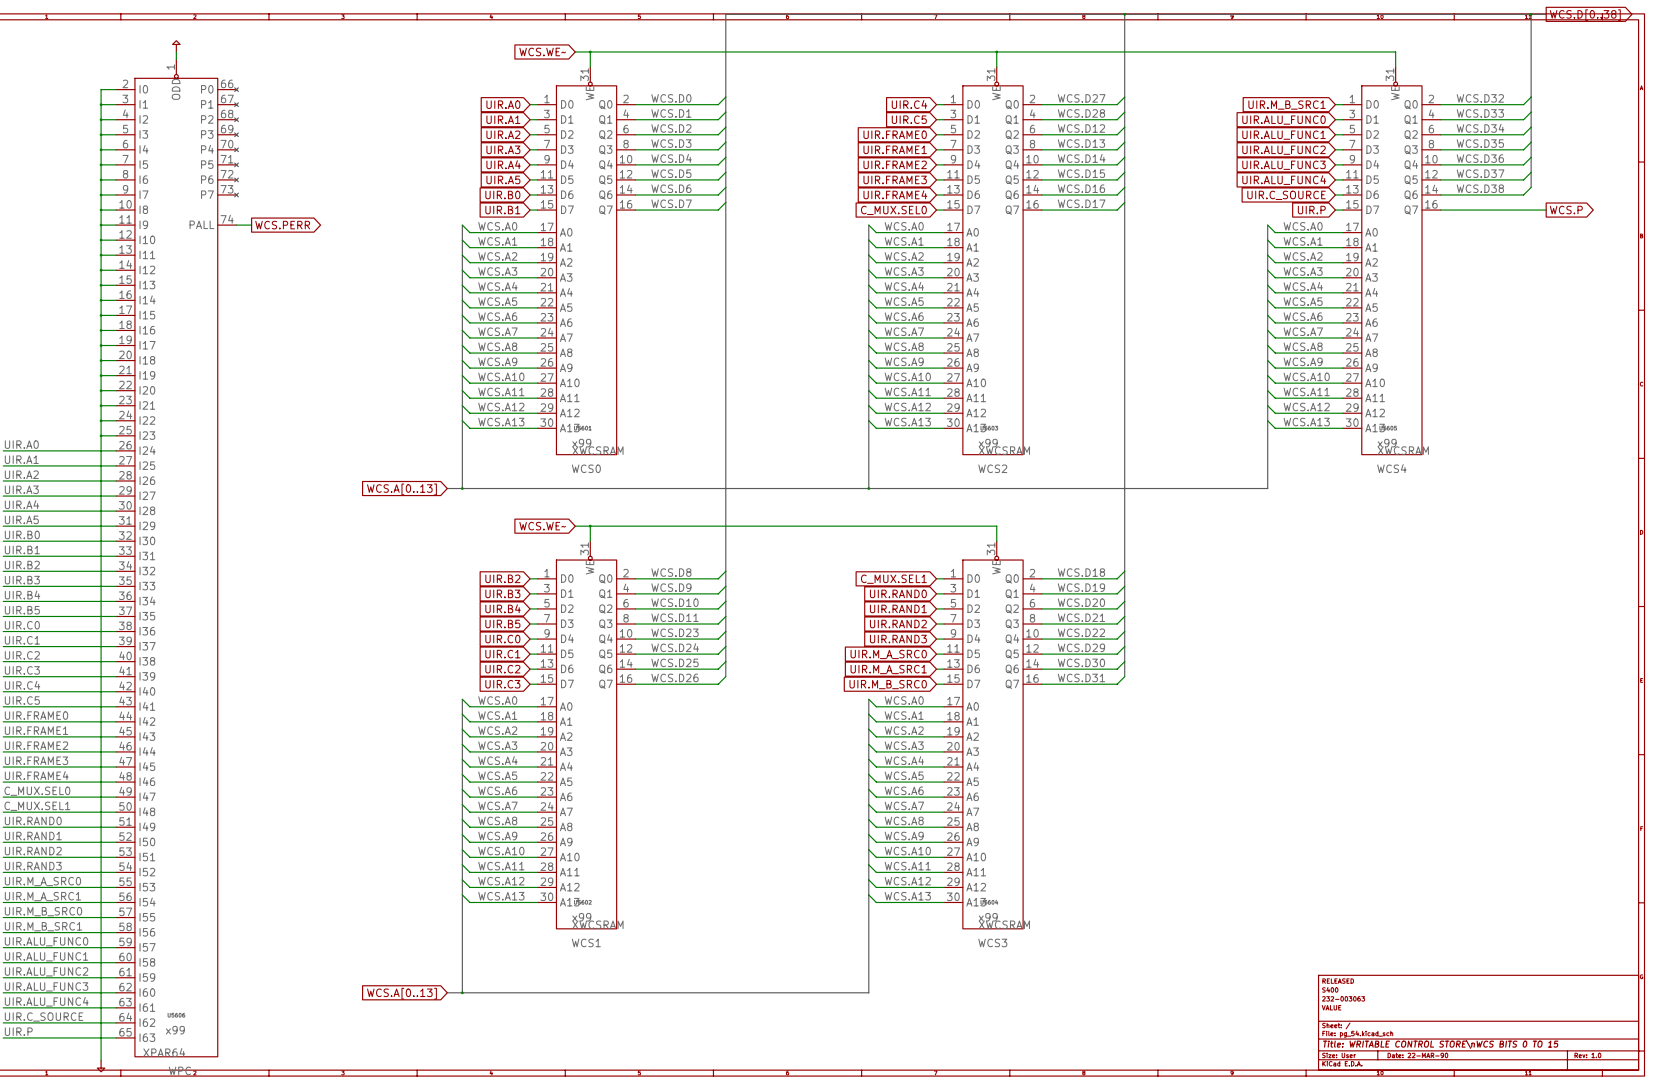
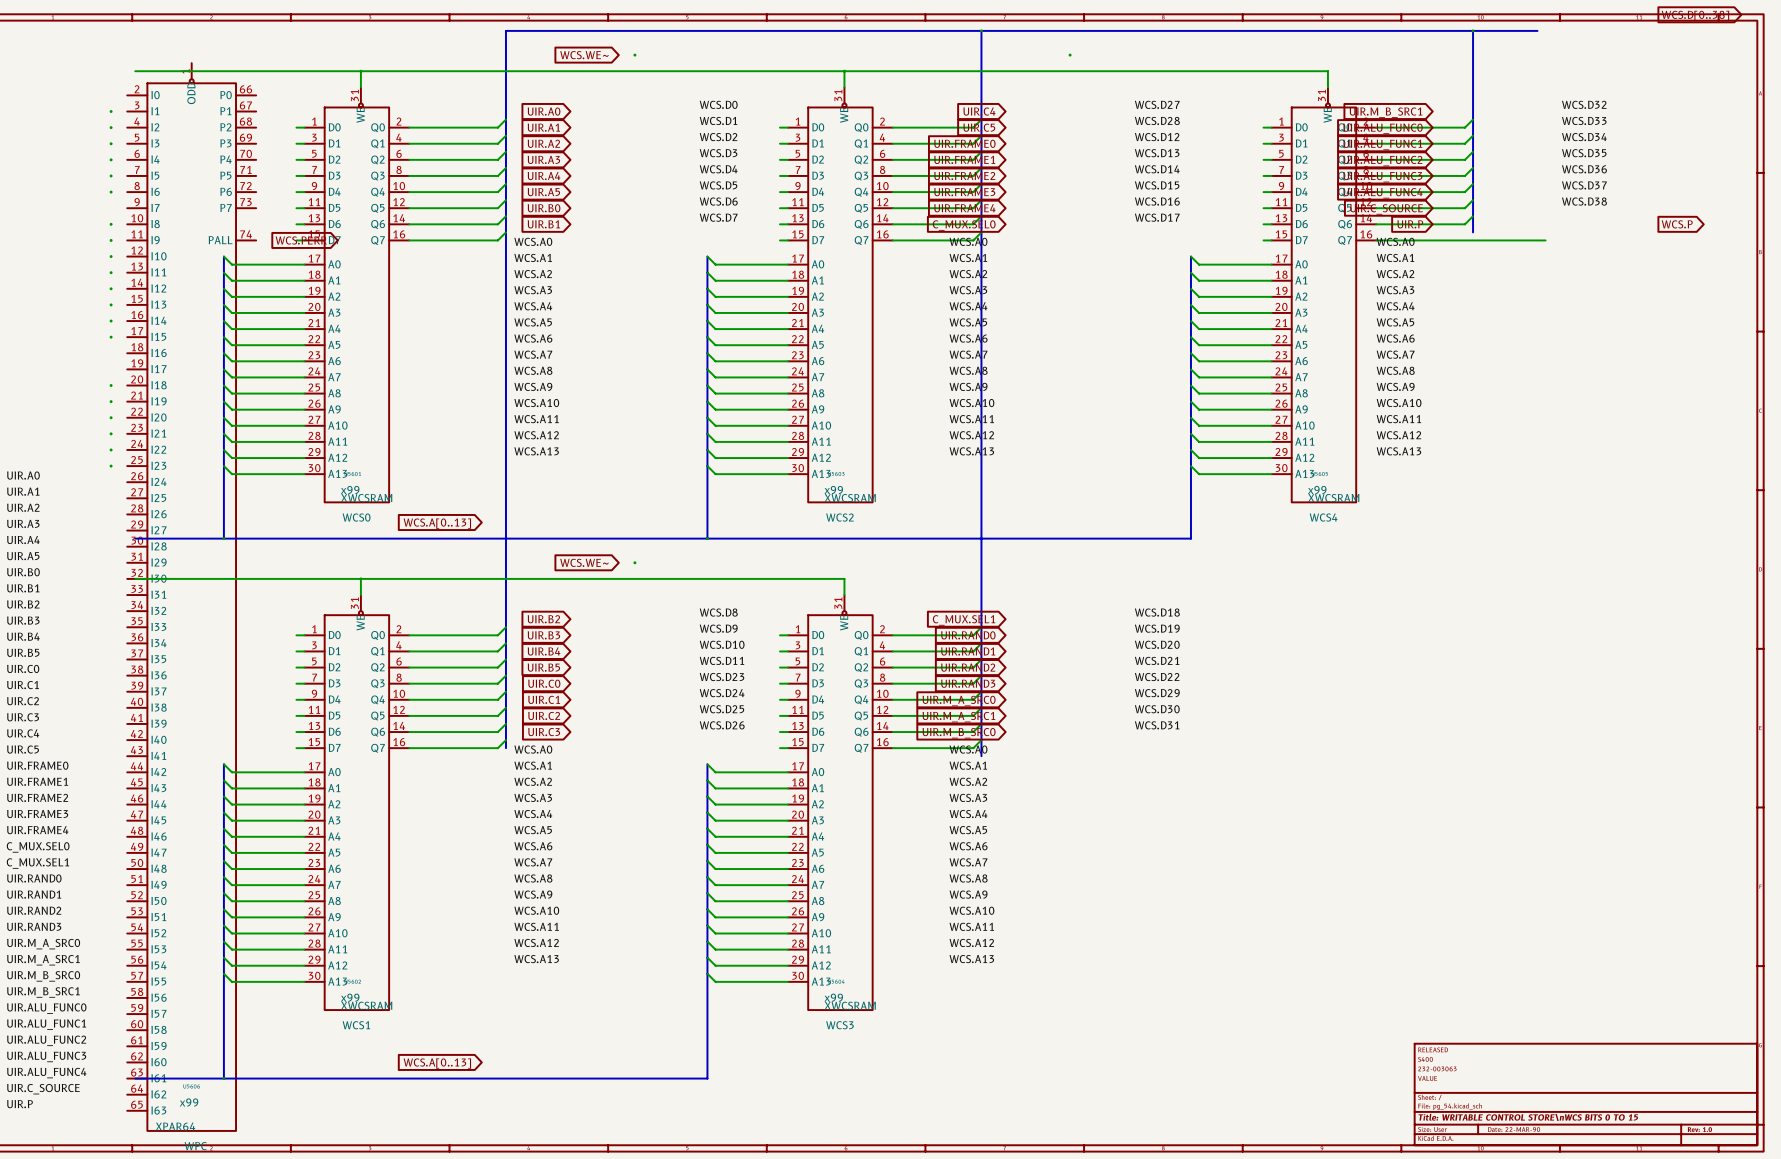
bus: (1124, 14) (1124, 676) -> none
junction: (1124, 14) -> none
bus: (1531, 14) (1531, 187) -> none
junction: (1531, 14) -> none
bus: (1546, 14) (725, 14) (725, 676) -> none
bus: none -> (981, 30) (981, 756)
junction: none -> (981, 30)
bus: none -> (1473, 30) (1473, 232)
junction: none -> (1473, 30)
bus: none -> (1537, 30) (505, 30) (505, 748)
power symbol: (176, 46) -> none
wire: (176, 51) (176, 59) -> none
wire: (575, 51) (1395, 51) (1395, 67) -> none
wire: (590, 51) (590, 67) -> none
wire: (996, 51) (996, 67) -> none
wire: none -> (135, 71) (1327, 71) (1327, 87)
wire: none -> (360, 71) (360, 87)
wire: none -> (844, 71) (844, 87)
wire: (116, 89) (101, 89) (101, 1060) -> none
no-connect mark: (236, 89) -> none
wire: (725, 97) (718, 104) (635, 104) -> none
wire: (1124, 97) (1117, 104) (1041, 104) -> none
wire: (1531, 97) (1523, 104) (1440, 104) -> none
wire: (101, 104) (116, 104) -> none
no-connect mark: (236, 104) -> none
wire: (530, 104) (537, 104) -> none
wire: (936, 104) (944, 104) -> none
wire: (1335, 104) (1342, 104) -> none
wire: none -> (505, 119) (497, 127) (409, 127)
wire: (725, 112) (718, 119) (635, 119) -> none
wire: none -> (981, 119) (973, 127) (892, 127)
wire: (1124, 112) (1117, 119) (1041, 119) -> none
wire: (1531, 112) (1523, 119) (1440, 119) -> none
wire: (101, 119) (116, 119) -> none
no-connect mark: (236, 119) -> none
wire: none -> (296, 127) (304, 127)
wire: (530, 119) (537, 119) -> none
wire: none -> (779, 127) (788, 127)
wire: (936, 119) (944, 119) -> none
wire: none -> (1263, 127) (1271, 127)
wire: none -> (1376, 127) (1432, 127)
wire: none -> (505, 135) (497, 143) (409, 143)
wire: (725, 127) (718, 134) (635, 134) -> none
wire: none -> (981, 135) (973, 143) (892, 143)
wire: (1124, 127) (1117, 134) (1041, 134) -> none
wire: (1531, 127) (1523, 134) (1440, 134) -> none
wire: (101, 134) (116, 134) -> none
no-connect mark: (236, 134) -> none
wire: none -> (296, 143) (304, 143)
wire: (530, 134) (537, 134) -> none
wire: none -> (779, 143) (788, 143)
wire: (936, 134) (944, 134) -> none
wire: none -> (1263, 143) (1271, 143)
wire: none -> (1376, 143) (1432, 143)
wire: none -> (505, 151) (497, 159) (409, 159)
wire: (725, 142) (718, 149) (635, 149) -> none
wire: none -> (981, 151) (973, 159) (892, 159)
wire: (1124, 142) (1117, 149) (1041, 149) -> none
wire: (1531, 142) (1523, 149) (1440, 149) -> none
wire: (101, 149) (116, 149) -> none
no-connect mark: (236, 149) -> none
wire: none -> (296, 159) (304, 159)
wire: (530, 149) (537, 149) -> none
wire: none -> (779, 159) (788, 159)
wire: (936, 149) (944, 149) -> none
wire: none -> (1263, 159) (1271, 159)
wire: none -> (1376, 159) (1432, 159)
wire: none -> (505, 167) (497, 175) (409, 175)
wire: (725, 157) (718, 164) (635, 164) -> none
wire: none -> (981, 167) (973, 175) (892, 175)
wire: (1124, 157) (1117, 164) (1041, 164) -> none
wire: (1531, 157) (1523, 164) (1440, 164) -> none
wire: (101, 164) (116, 164) -> none
no-connect mark: (236, 164) -> none
wire: none -> (296, 175) (304, 175)
wire: (530, 164) (537, 164) -> none
wire: none -> (779, 175) (788, 175)
wire: (936, 164) (944, 164) -> none
wire: none -> (1263, 175) (1271, 175)
wire: none -> (1376, 175) (1432, 175)
wire: none -> (505, 184) (497, 192) (409, 192)
wire: (725, 172) (718, 179) (635, 179) -> none
wire: none -> (981, 184) (973, 192) (892, 192)
wire: (1124, 172) (1117, 179) (1041, 179) -> none
wire: (1531, 172) (1523, 179) (1440, 179) -> none
wire: (101, 179) (116, 179) -> none
no-connect mark: (236, 179) -> none
wire: none -> (296, 192) (304, 192)
wire: (530, 179) (537, 179) -> none
wire: none -> (779, 192) (788, 192)
wire: (936, 179) (944, 179) -> none
wire: none -> (1263, 192) (1271, 192)
wire: none -> (1376, 192) (1432, 192)
wire: none -> (505, 200) (497, 208) (409, 208)
wire: (725, 187) (718, 194) (635, 194) -> none
wire: none -> (981, 200) (973, 208) (892, 208)
wire: (1124, 187) (1117, 194) (1041, 194) -> none
wire: (1531, 187) (1523, 194) (1440, 194) -> none
wire: (101, 194) (116, 194) -> none
no-connect mark: (236, 194) -> none
wire: none -> (296, 208) (304, 208)
wire: (530, 194) (537, 194) -> none
wire: none -> (779, 208) (788, 208)
wire: (936, 194) (944, 194) -> none
wire: none -> (1263, 208) (1271, 208)
wire: none -> (1376, 208) (1432, 208)
wire: none -> (505, 216) (497, 224) (409, 224)
wire: (725, 202) (718, 210) (635, 210) -> none
wire: none -> (981, 216) (973, 224) (892, 224)
wire: (1124, 202) (1117, 210) (1041, 210) -> none
wire: (101, 210) (116, 210) -> none
wire: none -> (296, 224) (304, 224)
wire: (530, 210) (537, 210) -> none
wire: none -> (779, 224) (788, 224)
wire: (936, 210) (944, 210) -> none
wire: none -> (1263, 224) (1271, 224)
wire: none -> (1376, 224) (1432, 224)
wire: (1440, 210) (1546, 210) -> none
wire: none -> (505, 232) (497, 240) (409, 240)
wire: none -> (981, 232) (973, 240) (892, 240)
wire: (101, 225) (116, 225) -> none
wire: (236, 225) (251, 225) -> none
wire: none -> (296, 240) (304, 240)
bus: (462, 225) (462, 488) -> none
wire: (462, 225) (469, 232) (537, 232) -> none
wire: none -> (779, 240) (788, 240)
bus: (868, 225) (868, 488) -> none
wire: (868, 225) (876, 232) (944, 232) -> none
wire: none -> (1263, 240) (1271, 240)
bus: (1267, 225) (1267, 488) (447, 488) -> none
wire: (1267, 225) (1275, 232) (1342, 232) -> none
wire: none -> (1376, 240) (1545, 240)
wire: (101, 240) (116, 240) -> none
bus: none -> (223, 256) (223, 538)
wire: none -> (223, 256) (231, 264) (304, 264)
wire: (462, 240) (469, 247) (537, 247) -> none
bus: none -> (707, 256) (707, 538)
wire: none -> (707, 256) (715, 264) (788, 264)
wire: (868, 240) (876, 247) (944, 247) -> none
bus: none -> (1190, 256) (1190, 538) (135, 538)
wire: none -> (1190, 256) (1199, 264) (1271, 264)
wire: (1267, 240) (1275, 247) (1342, 247) -> none
wire: (101, 255) (116, 255) -> none
wire: none -> (223, 272) (231, 280) (304, 280)
wire: (462, 255) (469, 262) (537, 262) -> none
wire: none -> (707, 272) (715, 280) (788, 280)
wire: (868, 255) (876, 262) (944, 262) -> none
wire: none -> (1190, 272) (1199, 280) (1271, 280)
wire: (1267, 255) (1275, 262) (1342, 262) -> none
part position: (586, 260) -> (356, 294)
part position: (992, 260) -> (840, 294)
part position: (1391, 260) -> (1323, 294)
wire: (101, 270) (116, 270) -> none
wire: none -> (223, 288) (231, 296) (304, 296)
wire: (462, 270) (469, 277) (537, 277) -> none
wire: none -> (707, 288) (715, 296) (788, 296)
wire: (868, 270) (876, 277) (944, 277) -> none
wire: none -> (1190, 288) (1199, 296) (1271, 296)
wire: (1267, 270) (1275, 277) (1342, 277) -> none
wire: (101, 285) (116, 285) -> none
wire: none -> (223, 304) (231, 312) (304, 312)
wire: (462, 285) (469, 292) (537, 292) -> none
wire: none -> (707, 304) (715, 312) (788, 312)
wire: (868, 285) (876, 292) (944, 292) -> none
wire: none -> (1190, 304) (1199, 312) (1271, 312)
wire: (1267, 285) (1275, 292) (1342, 292) -> none
wire: (101, 300) (116, 300) -> none
wire: none -> (223, 321) (231, 329) (304, 329)
wire: (462, 300) (469, 307) (537, 307) -> none
wire: none -> (707, 321) (715, 329) (788, 329)
wire: (868, 300) (876, 307) (944, 307) -> none
wire: none -> (1190, 321) (1199, 329) (1271, 329)
wire: (1267, 300) (1275, 307) (1342, 307) -> none
wire: (101, 315) (116, 315) -> none
wire: none -> (223, 337) (231, 345) (304, 345)
wire: (462, 315) (469, 322) (537, 322) -> none
wire: none -> (707, 337) (715, 345) (788, 345)
wire: (868, 315) (876, 322) (944, 322) -> none
wire: none -> (1190, 337) (1199, 345) (1271, 345)
wire: (1267, 315) (1275, 322) (1342, 322) -> none
wire: (101, 330) (116, 330) -> none
junction: (101, 330) -> none
wire: none -> (223, 353) (231, 361) (304, 361)
wire: (462, 330) (469, 337) (537, 337) -> none
wire: none -> (707, 353) (715, 361) (788, 361)
wire: (868, 330) (876, 337) (944, 337) -> none
wire: none -> (1190, 353) (1199, 361) (1271, 361)
wire: (1267, 330) (1275, 337) (1342, 337) -> none
wire: (101, 345) (116, 345) -> none
junction: (101, 345) -> none
wire: none -> (223, 369) (231, 377) (304, 377)
wire: (462, 345) (469, 353) (537, 353) -> none
wire: none -> (707, 369) (715, 377) (788, 377)
wire: (868, 345) (876, 353) (944, 353) -> none
wire: none -> (1190, 369) (1199, 377) (1271, 377)
wire: (1267, 345) (1275, 353) (1342, 353) -> none
wire: (101, 360) (116, 360) -> none
wire: none -> (223, 385) (231, 393) (304, 393)
wire: (462, 360) (469, 368) (537, 368) -> none
wire: none -> (707, 385) (715, 393) (788, 393)
wire: (868, 360) (876, 368) (944, 368) -> none
wire: none -> (1190, 385) (1199, 393) (1271, 393)
wire: (1267, 360) (1275, 368) (1342, 368) -> none
wire: (101, 375) (116, 375) -> none
wire: none -> (223, 401) (231, 409) (304, 409)
wire: (462, 375) (469, 383) (537, 383) -> none
wire: none -> (707, 401) (715, 409) (788, 409)
wire: (868, 375) (876, 383) (944, 383) -> none
wire: none -> (1190, 401) (1199, 409) (1271, 409)
wire: (1267, 375) (1275, 383) (1342, 383) -> none
wire: (101, 390) (116, 390) -> none
wire: none -> (223, 417) (231, 425) (304, 425)
wire: (462, 390) (469, 398) (537, 398) -> none
wire: none -> (707, 417) (715, 425) (788, 425)
wire: (868, 390) (876, 398) (944, 398) -> none
wire: none -> (1190, 417) (1199, 425) (1271, 425)
wire: (1267, 390) (1275, 398) (1342, 398) -> none
wire: (101, 405) (116, 405) -> none
wire: none -> (223, 433) (231, 441) (304, 441)
wire: (462, 405) (469, 413) (537, 413) -> none
wire: none -> (707, 433) (715, 441) (788, 441)
wire: (868, 405) (876, 413) (944, 413) -> none
wire: none -> (1190, 433) (1199, 441) (1271, 441)
wire: (1267, 405) (1275, 413) (1342, 413) -> none
wire: (101, 420) (116, 420) -> none
wire: none -> (223, 449) (231, 458) (304, 458)
wire: (462, 420) (469, 428) (537, 428) -> none
wire: none -> (707, 449) (715, 458) (788, 458)
wire: (868, 420) (876, 428) (944, 428) -> none
wire: none -> (1190, 449) (1199, 458) (1271, 458)
wire: (1267, 420) (1275, 428) (1342, 428) -> none
wire: (101, 435) (116, 435) -> none
wire: none -> (223, 466) (231, 474) (304, 474)
wire: none -> (707, 466) (715, 474) (788, 474)
wire: none -> (1190, 466) (1199, 474) (1271, 474)
wire: (3, 450) (116, 450) -> none
wire: (3, 465) (116, 465) -> none
wire: (3, 480) (116, 480) -> none
junction: (462, 488) -> none
junction: (868, 488) -> none
wire: (3, 496) (116, 496) -> none
junction: none -> (223, 538)
junction: none -> (707, 538)
wire: (3, 511) (116, 511) -> none
wire: (3, 526) (116, 526) -> none
wire: (575, 526) (996, 526) (996, 541) -> none
wire: (590, 526) (590, 541) -> none
wire: (3, 541) (116, 541) -> none
wire: none -> (135, 578) (844, 578) (844, 595)
wire: none -> (360, 578) (360, 595)
wire: (3, 556) (116, 556) -> none
wire: (3, 571) (116, 571) -> none
wire: (725, 571) (718, 578) (635, 578) -> none
wire: (1124, 571) (1117, 578) (1041, 578) -> none
wire: (530, 578) (537, 578) -> none
wire: (936, 578) (944, 578) -> none
wire: (3, 586) (116, 586) -> none
wire: none -> (505, 627) (497, 635) (409, 635)
wire: (725, 586) (718, 593) (635, 593) -> none
wire: none -> (981, 627) (973, 635) (892, 635)
wire: (1124, 586) (1117, 593) (1041, 593) -> none
wire: none -> (296, 635) (304, 635)
wire: (530, 593) (537, 593) -> none
wire: none -> (779, 635) (788, 635)
wire: (936, 593) (944, 593) -> none
wire: (3, 601) (116, 601) -> none
wire: none -> (505, 643) (497, 651) (409, 651)
wire: (725, 601) (718, 608) (635, 608) -> none
wire: none -> (981, 643) (973, 651) (892, 651)
wire: (1124, 601) (1117, 608) (1041, 608) -> none
wire: none -> (296, 651) (304, 651)
wire: (530, 608) (537, 608) -> none
wire: none -> (779, 651) (788, 651)
wire: (936, 608) (944, 608) -> none
wire: (3, 616) (116, 616) -> none
wire: none -> (505, 659) (497, 667) (409, 667)
wire: (725, 616) (718, 624) (635, 624) -> none
wire: none -> (981, 659) (973, 667) (892, 667)
wire: (1124, 616) (1117, 624) (1041, 624) -> none
wire: none -> (296, 667) (304, 667)
wire: (530, 624) (537, 624) -> none
wire: none -> (779, 667) (788, 667)
wire: (936, 624) (944, 624) -> none
wire: (3, 631) (116, 631) -> none
wire: none -> (505, 675) (497, 683) (409, 683)
wire: (725, 631) (718, 639) (635, 639) -> none
wire: none -> (981, 675) (973, 683) (892, 683)
wire: (1124, 631) (1117, 639) (1041, 639) -> none
wire: none -> (296, 683) (304, 683)
wire: (530, 639) (537, 639) -> none
wire: none -> (779, 683) (788, 683)
wire: (936, 639) (944, 639) -> none
wire: (3, 646) (116, 646) -> none
wire: none -> (505, 691) (497, 699) (409, 699)
wire: (725, 646) (718, 654) (635, 654) -> none
wire: none -> (981, 691) (973, 699) (892, 699)
wire: (1124, 646) (1117, 654) (1041, 654) -> none
wire: none -> (296, 699) (304, 699)
wire: (530, 654) (537, 654) -> none
wire: none -> (779, 699) (788, 699)
wire: (936, 654) (944, 654) -> none
wire: (3, 661) (116, 661) -> none
wire: none -> (505, 707) (497, 715) (409, 715)
wire: (725, 661) (718, 669) (635, 669) -> none
wire: none -> (981, 707) (973, 715) (892, 715)
wire: (1124, 661) (1117, 669) (1041, 669) -> none
wire: none -> (296, 715) (304, 715)
wire: (530, 669) (537, 669) -> none
wire: none -> (779, 715) (788, 715)
wire: (936, 669) (944, 669) -> none
wire: (3, 676) (116, 676) -> none
wire: none -> (505, 723) (497, 732) (409, 732)
wire: (725, 676) (718, 684) (635, 684) -> none
wire: none -> (981, 723) (973, 732) (892, 732)
wire: (1124, 676) (1117, 684) (1041, 684) -> none
wire: none -> (296, 732) (304, 732)
wire: (530, 684) (537, 684) -> none
wire: none -> (779, 732) (788, 732)
wire: (936, 684) (944, 684) -> none
wire: (3, 691) (116, 691) -> none
wire: none -> (505, 740) (497, 748) (409, 748)
wire: none -> (981, 740) (973, 748) (892, 748)
wire: none -> (296, 748) (304, 748)
bus: (462, 699) (462, 992) -> none
wire: (462, 699) (469, 706) (537, 706) -> none
wire: none -> (779, 748) (788, 748)
bus: (868, 699) (868, 992) (447, 992) -> none
wire: (868, 699) (876, 706) (944, 706) -> none
wire: (3, 706) (116, 706) -> none
bus: none -> (223, 764) (223, 1078)
wire: none -> (223, 764) (231, 772) (304, 772)
wire: (462, 714) (469, 721) (537, 721) -> none
bus: none -> (707, 764) (707, 1078) (135, 1078)
wire: none -> (707, 764) (715, 772) (788, 772)
wire: (868, 714) (876, 721) (944, 721) -> none
wire: (3, 721) (116, 721) -> none
wire: none -> (223, 780) (231, 788) (304, 788)
wire: (462, 729) (469, 736) (537, 736) -> none
wire: none -> (707, 780) (715, 788) (788, 788)
wire: (868, 729) (876, 736) (944, 736) -> none
part position: (586, 735) -> (356, 802)
part position: (992, 735) -> (840, 802)
wire: (3, 736) (116, 736) -> none
wire: none -> (223, 796) (231, 804) (304, 804)
wire: (462, 744) (469, 751) (537, 751) -> none
wire: none -> (707, 796) (715, 804) (788, 804)
wire: (868, 744) (876, 751) (944, 751) -> none
wire: (3, 751) (116, 751) -> none
wire: none -> (223, 812) (231, 820) (304, 820)
wire: (462, 759) (469, 767) (537, 767) -> none
wire: none -> (707, 812) (715, 820) (788, 820)
wire: (868, 759) (876, 767) (944, 767) -> none
wire: (3, 767) (116, 767) -> none
wire: none -> (223, 828) (231, 836) (304, 836)
wire: (462, 774) (469, 782) (537, 782) -> none
wire: none -> (707, 828) (715, 836) (788, 836)
wire: (868, 774) (876, 782) (944, 782) -> none
wire: (3, 782) (116, 782) -> none
wire: none -> (223, 844) (231, 852) (304, 852)
wire: (462, 789) (469, 797) (537, 797) -> none
wire: none -> (707, 844) (715, 852) (788, 852)
wire: (868, 789) (876, 797) (944, 797) -> none
wire: (3, 797) (116, 797) -> none
wire: none -> (223, 860) (231, 869) (304, 869)
wire: (462, 804) (469, 812) (537, 812) -> none
wire: none -> (707, 860) (715, 869) (788, 869)
wire: (868, 804) (876, 812) (944, 812) -> none
wire: (3, 812) (116, 812) -> none
wire: none -> (223, 877) (231, 885) (304, 885)
wire: (462, 819) (469, 827) (537, 827) -> none
wire: none -> (707, 877) (715, 885) (788, 885)
wire: (868, 819) (876, 827) (944, 827) -> none
wire: (3, 827) (116, 827) -> none
wire: none -> (223, 893) (231, 901) (304, 901)
wire: (462, 834) (469, 842) (537, 842) -> none
wire: none -> (707, 893) (715, 901) (788, 901)
wire: (868, 834) (876, 842) (944, 842) -> none
wire: (3, 842) (116, 842) -> none
wire: none -> (223, 909) (231, 917) (304, 917)
wire: (462, 849) (469, 857) (537, 857) -> none
wire: none -> (707, 909) (715, 917) (788, 917)
wire: (868, 849) (876, 857) (944, 857) -> none
wire: (3, 857) (116, 857) -> none
wire: none -> (223, 925) (231, 933) (304, 933)
wire: (462, 864) (469, 872) (537, 872) -> none
wire: none -> (707, 925) (715, 933) (788, 933)
wire: (868, 864) (876, 872) (944, 872) -> none
wire: (3, 872) (116, 872) -> none
wire: none -> (223, 941) (231, 949) (304, 949)
wire: (462, 879) (469, 887) (537, 887) -> none
wire: none -> (707, 941) (715, 949) (788, 949)
wire: (868, 879) (876, 887) (944, 887) -> none
wire: (3, 887) (116, 887) -> none
wire: none -> (223, 957) (231, 965) (304, 965)
wire: (462, 894) (469, 902) (537, 902) -> none
wire: none -> (707, 957) (715, 965) (788, 965)
wire: (868, 894) (876, 902) (944, 902) -> none
wire: (3, 902) (116, 902) -> none
wire: none -> (223, 973) (231, 981) (304, 981)
wire: none -> (707, 973) (715, 981) (788, 981)
wire: (3, 917) (116, 917) -> none
wire: (3, 932) (116, 932) -> none
wire: (3, 947) (116, 947) -> none
wire: (3, 962) (116, 962) -> none
wire: (3, 977) (116, 977) -> none
wire: (3, 992) (116, 992) -> none
junction: (462, 992) -> none
wire: (3, 1007) (116, 1007) -> none
junction: none -> (223, 1078)
wire: (3, 1022) (116, 1022) -> none
wire: (3, 1037) (116, 1037) -> none
power symbol: (101, 1066) -> none

